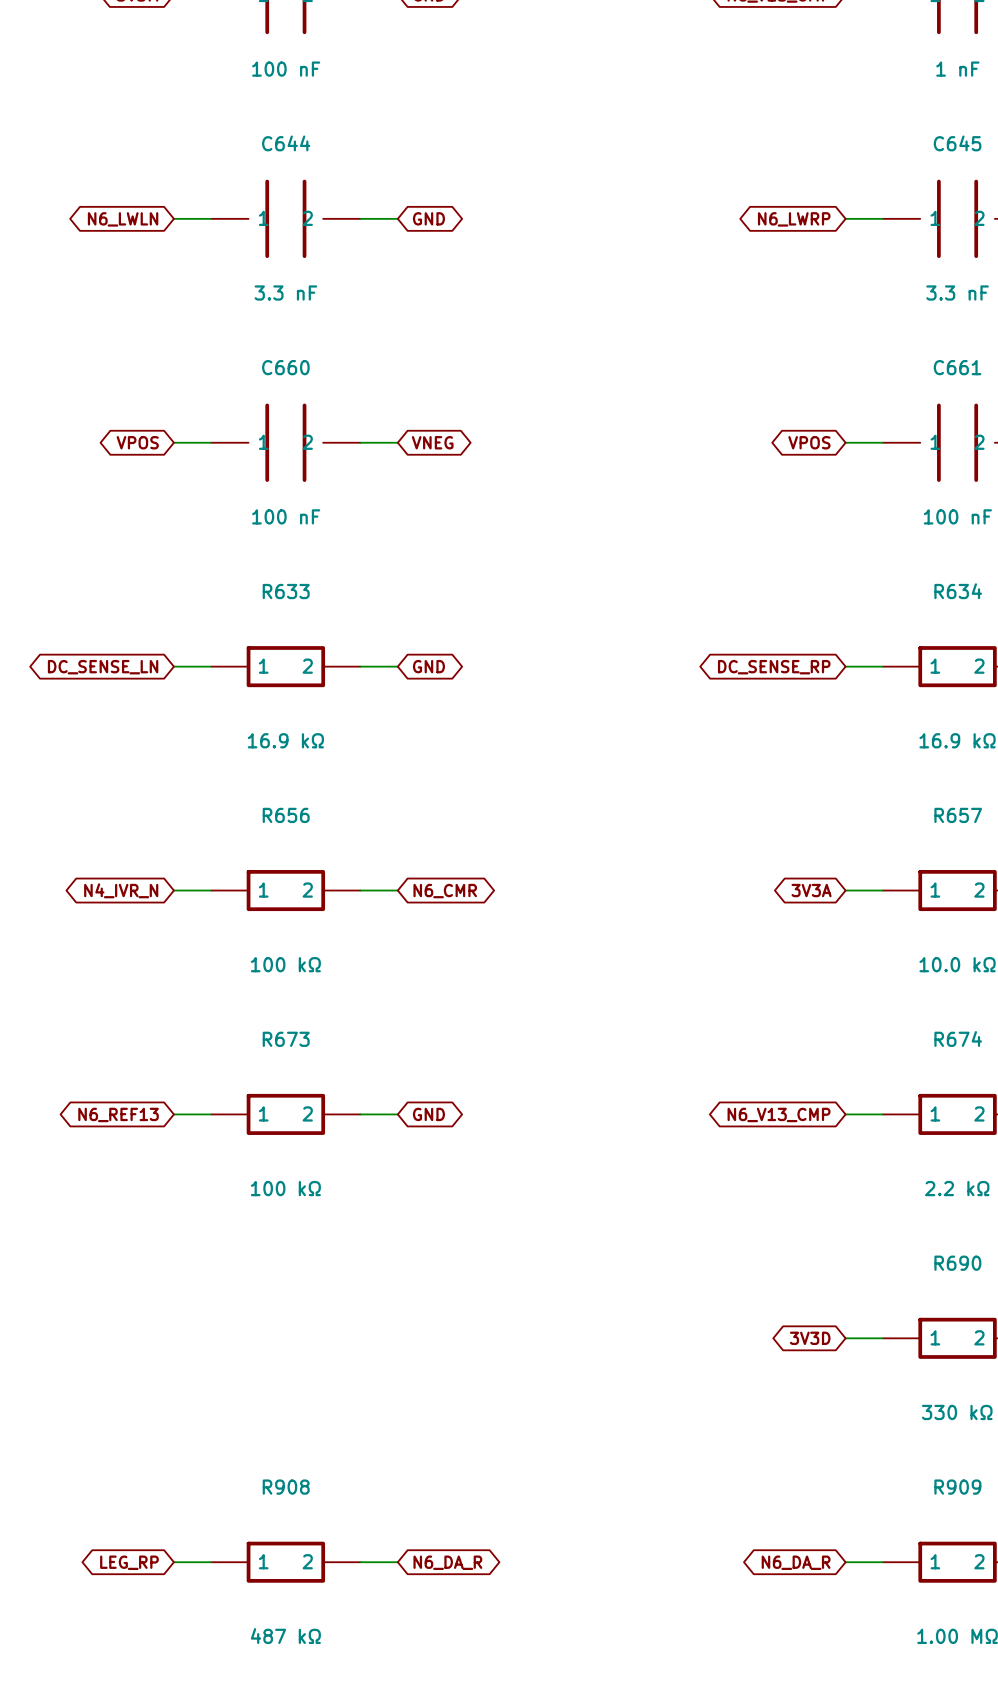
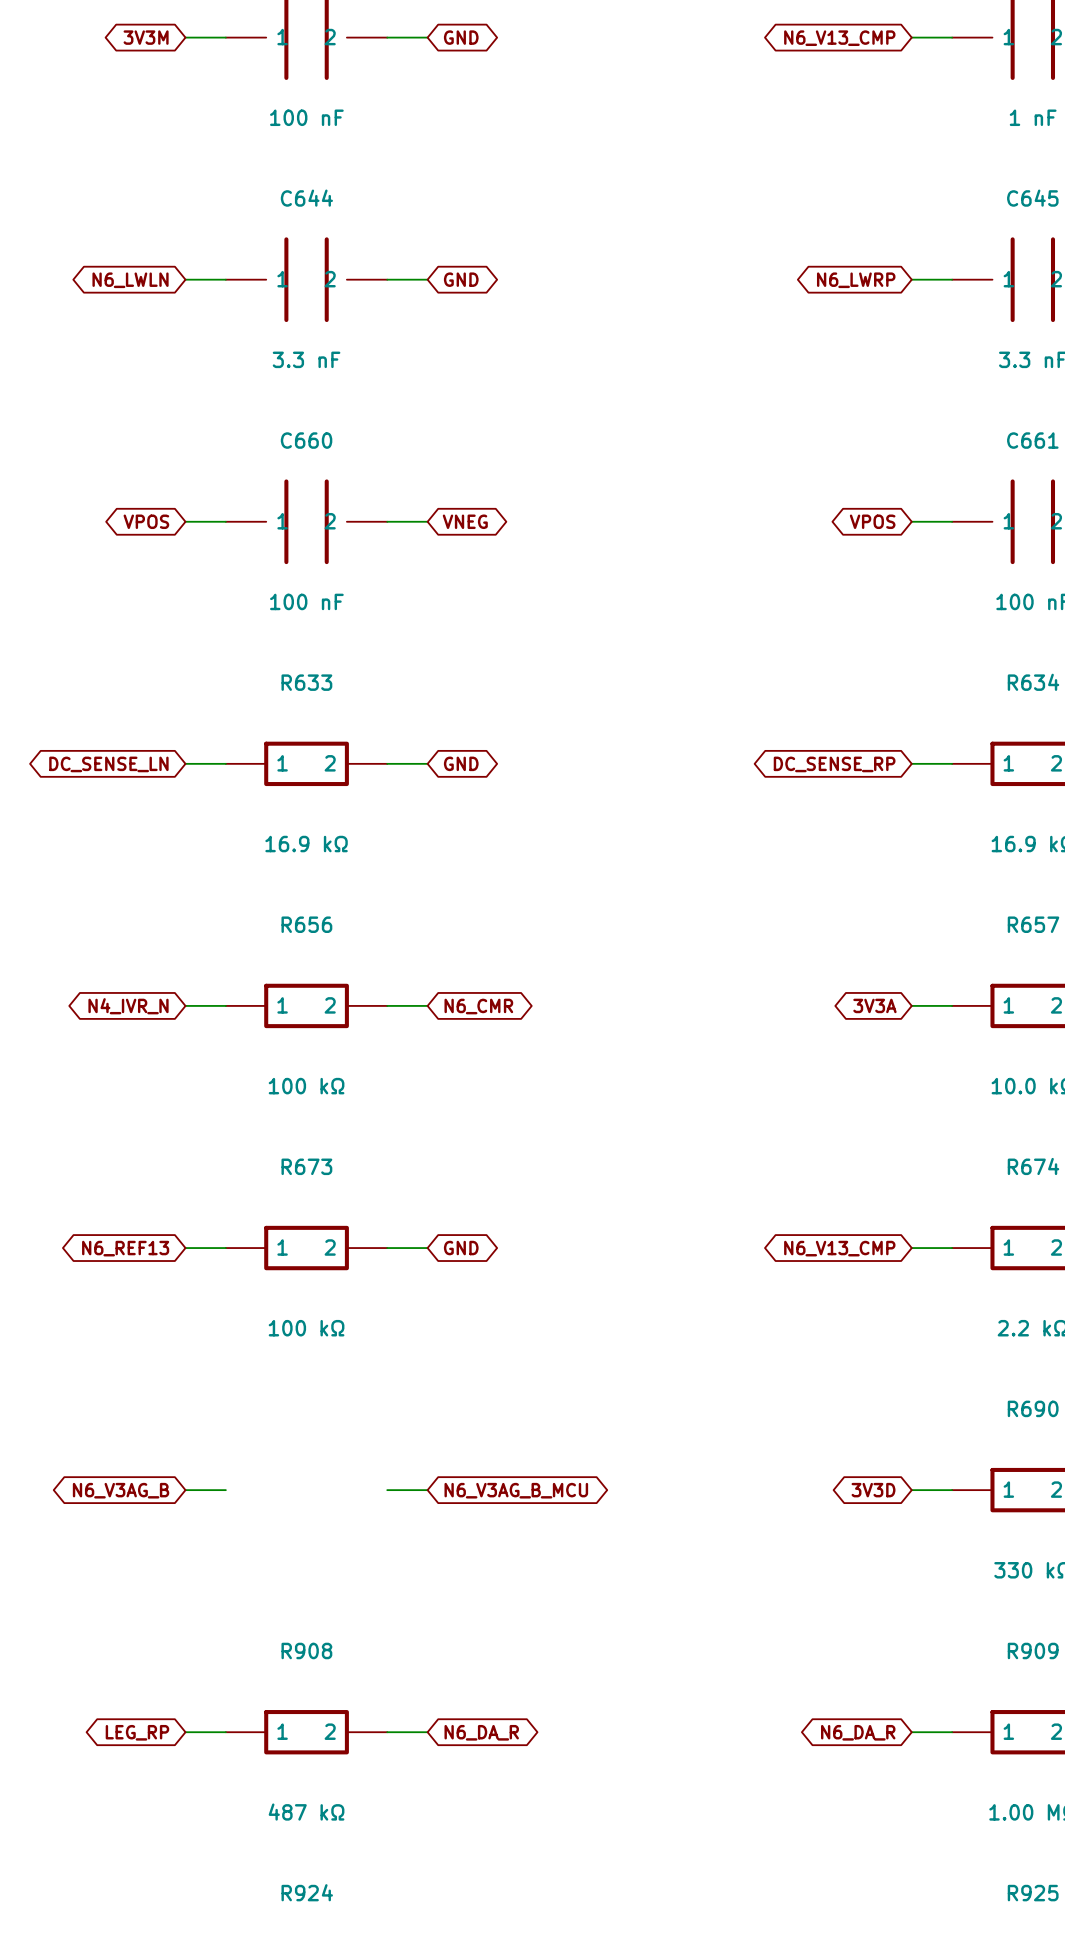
global label: none -> N6_V3AG_B (121, 1490)
wire: none -> (185, 1490) (225, 1490)
wire: none -> (387, 1490) (427, 1490)
global label: none -> N6_V3AG_B_MCU (516, 1490)

